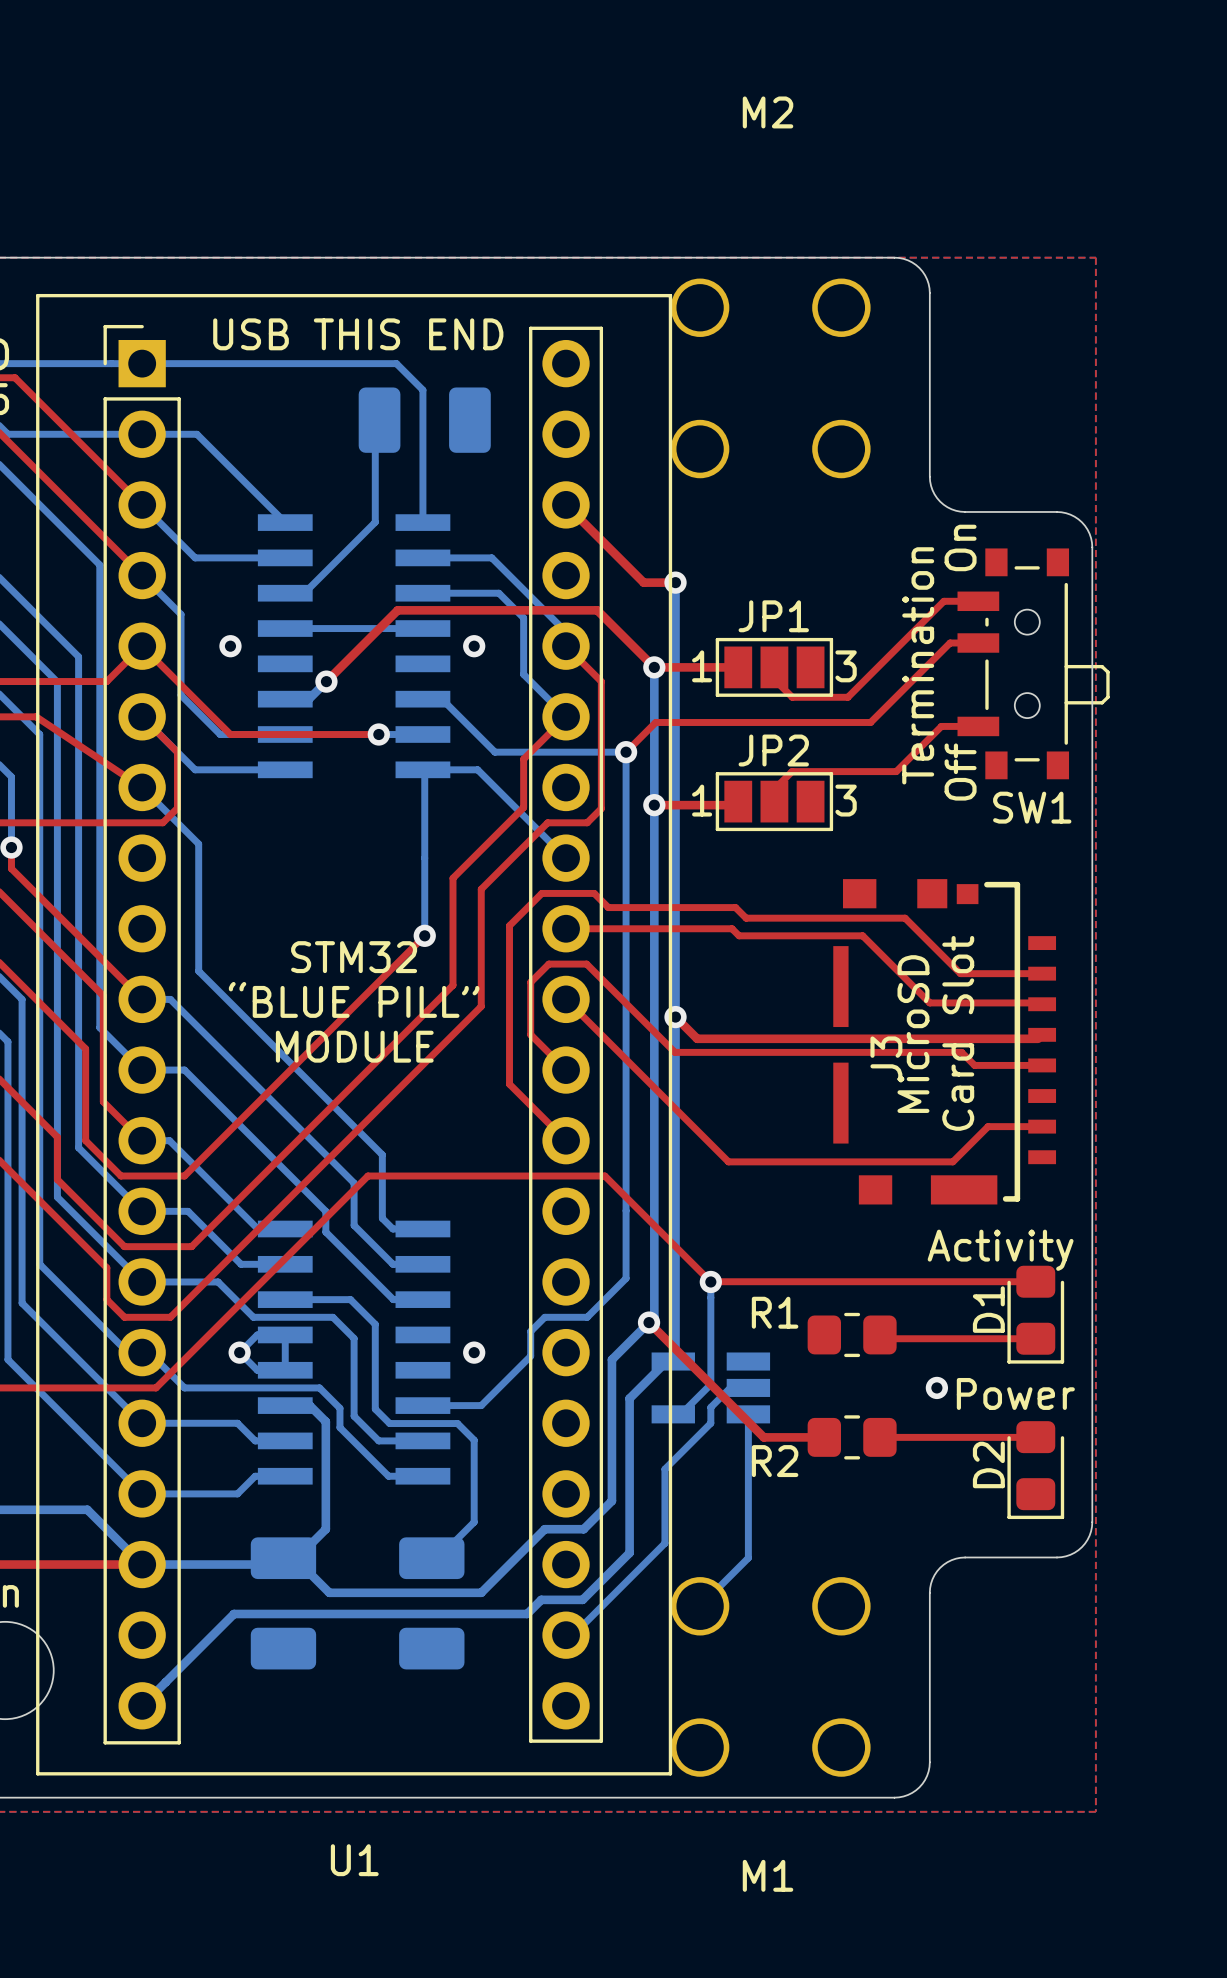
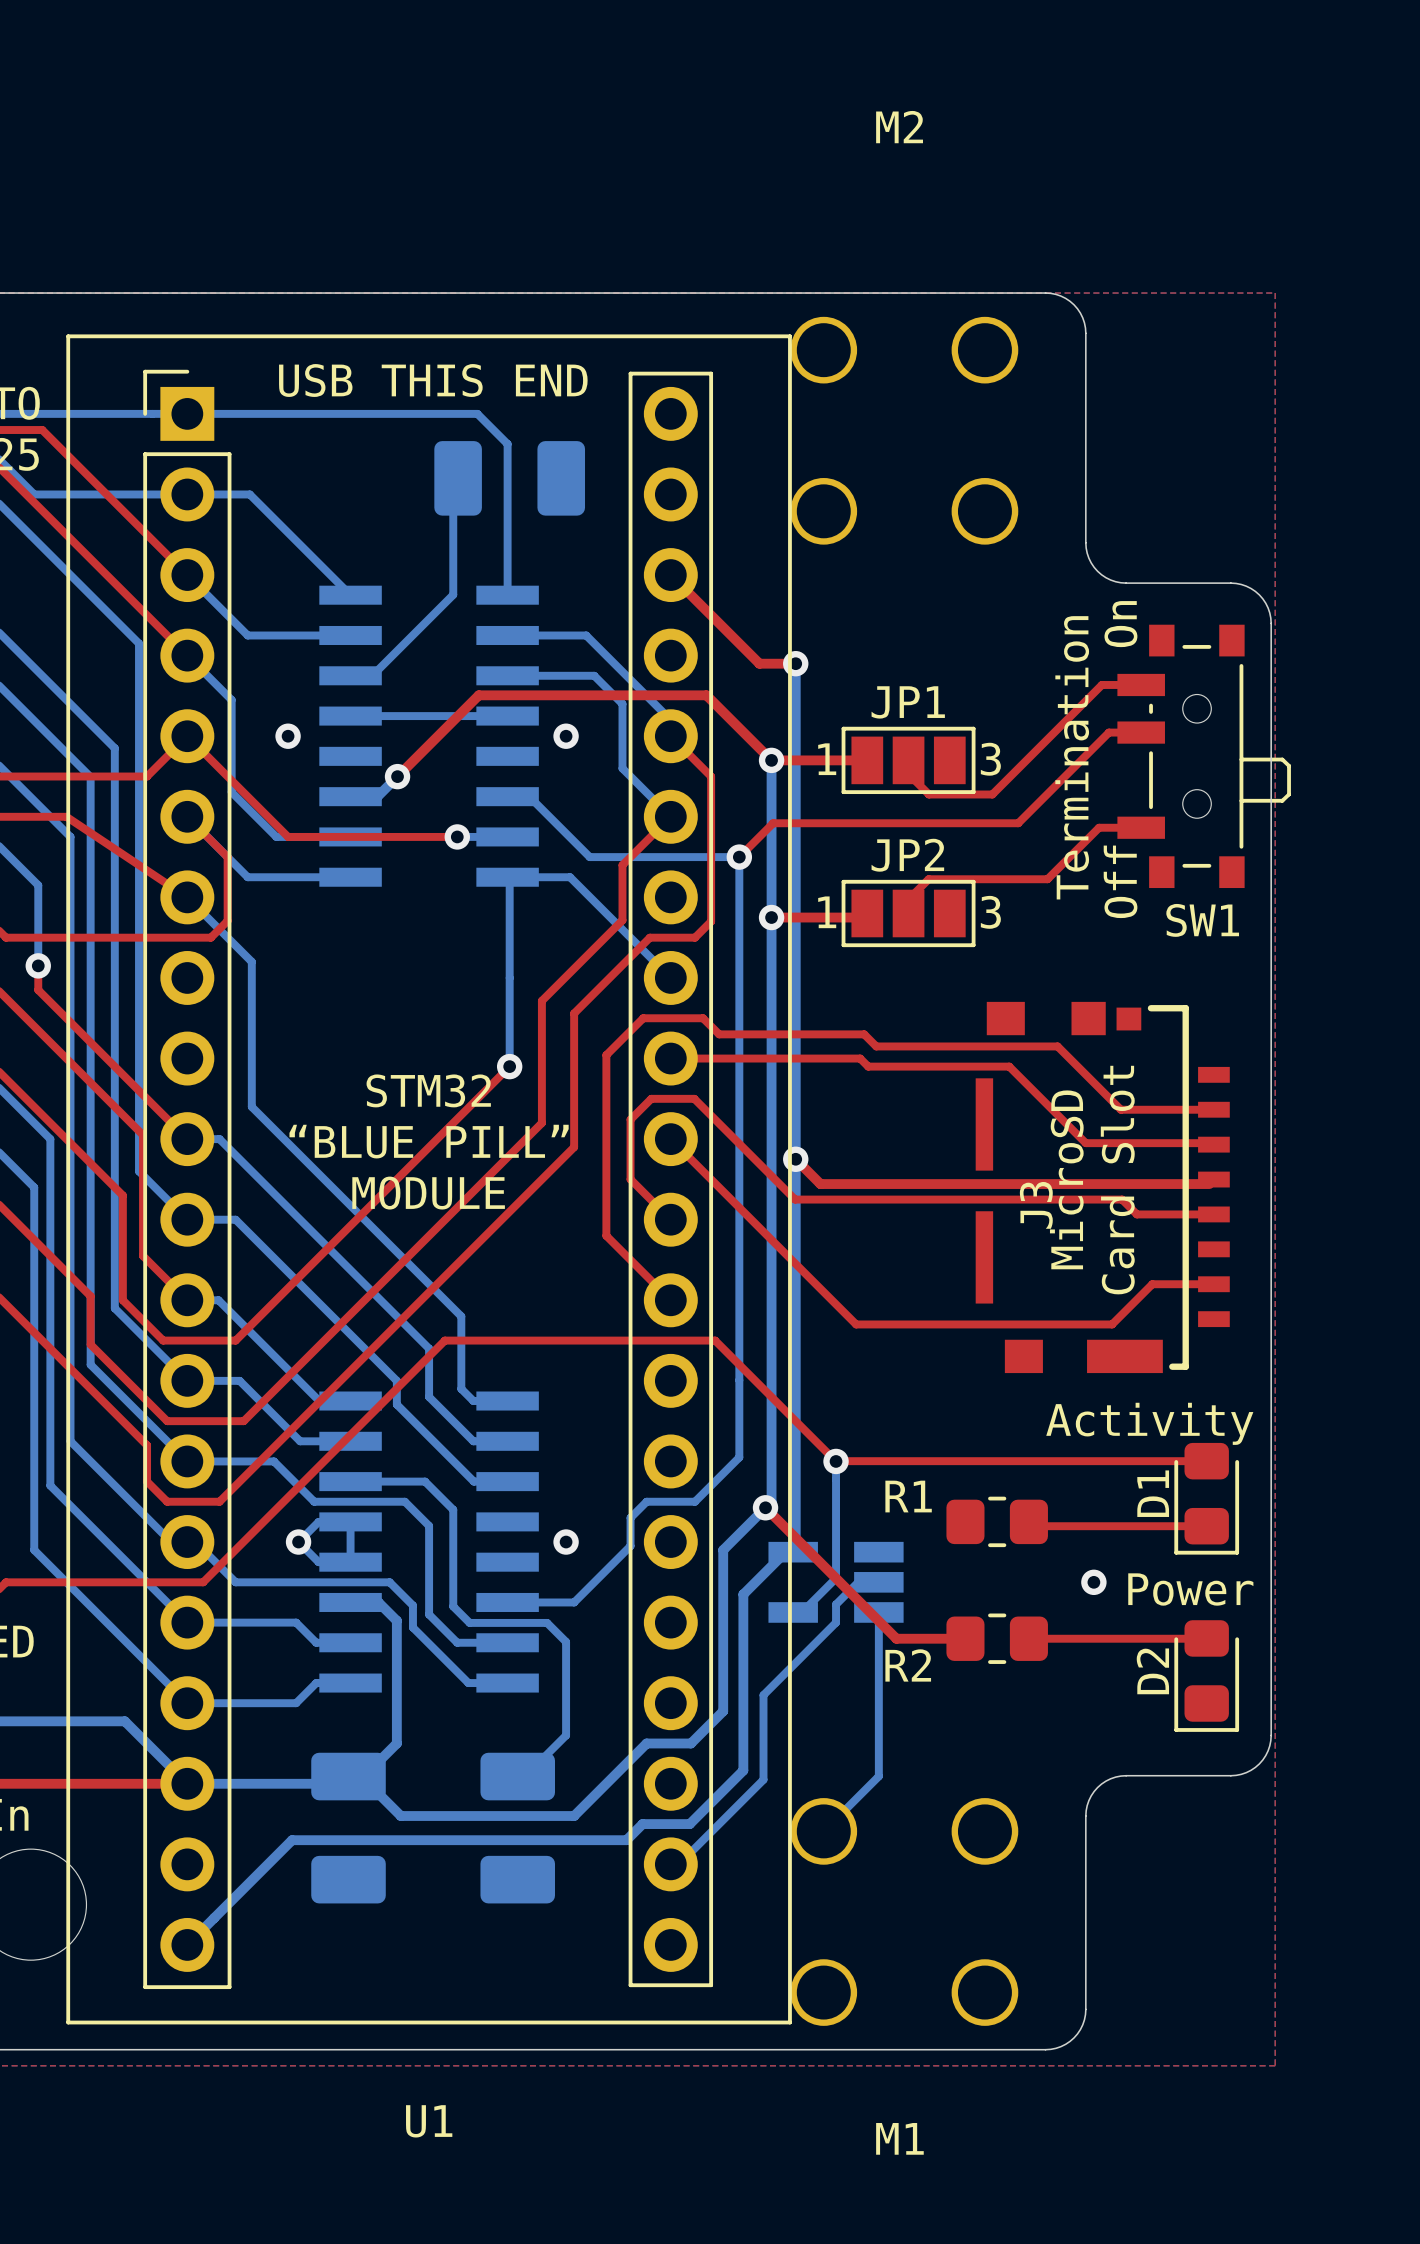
bottom track: (664, 1469) (664, 1543) (647, 1561) -> (783, 1674) (763, 1695) (763, 1779)

